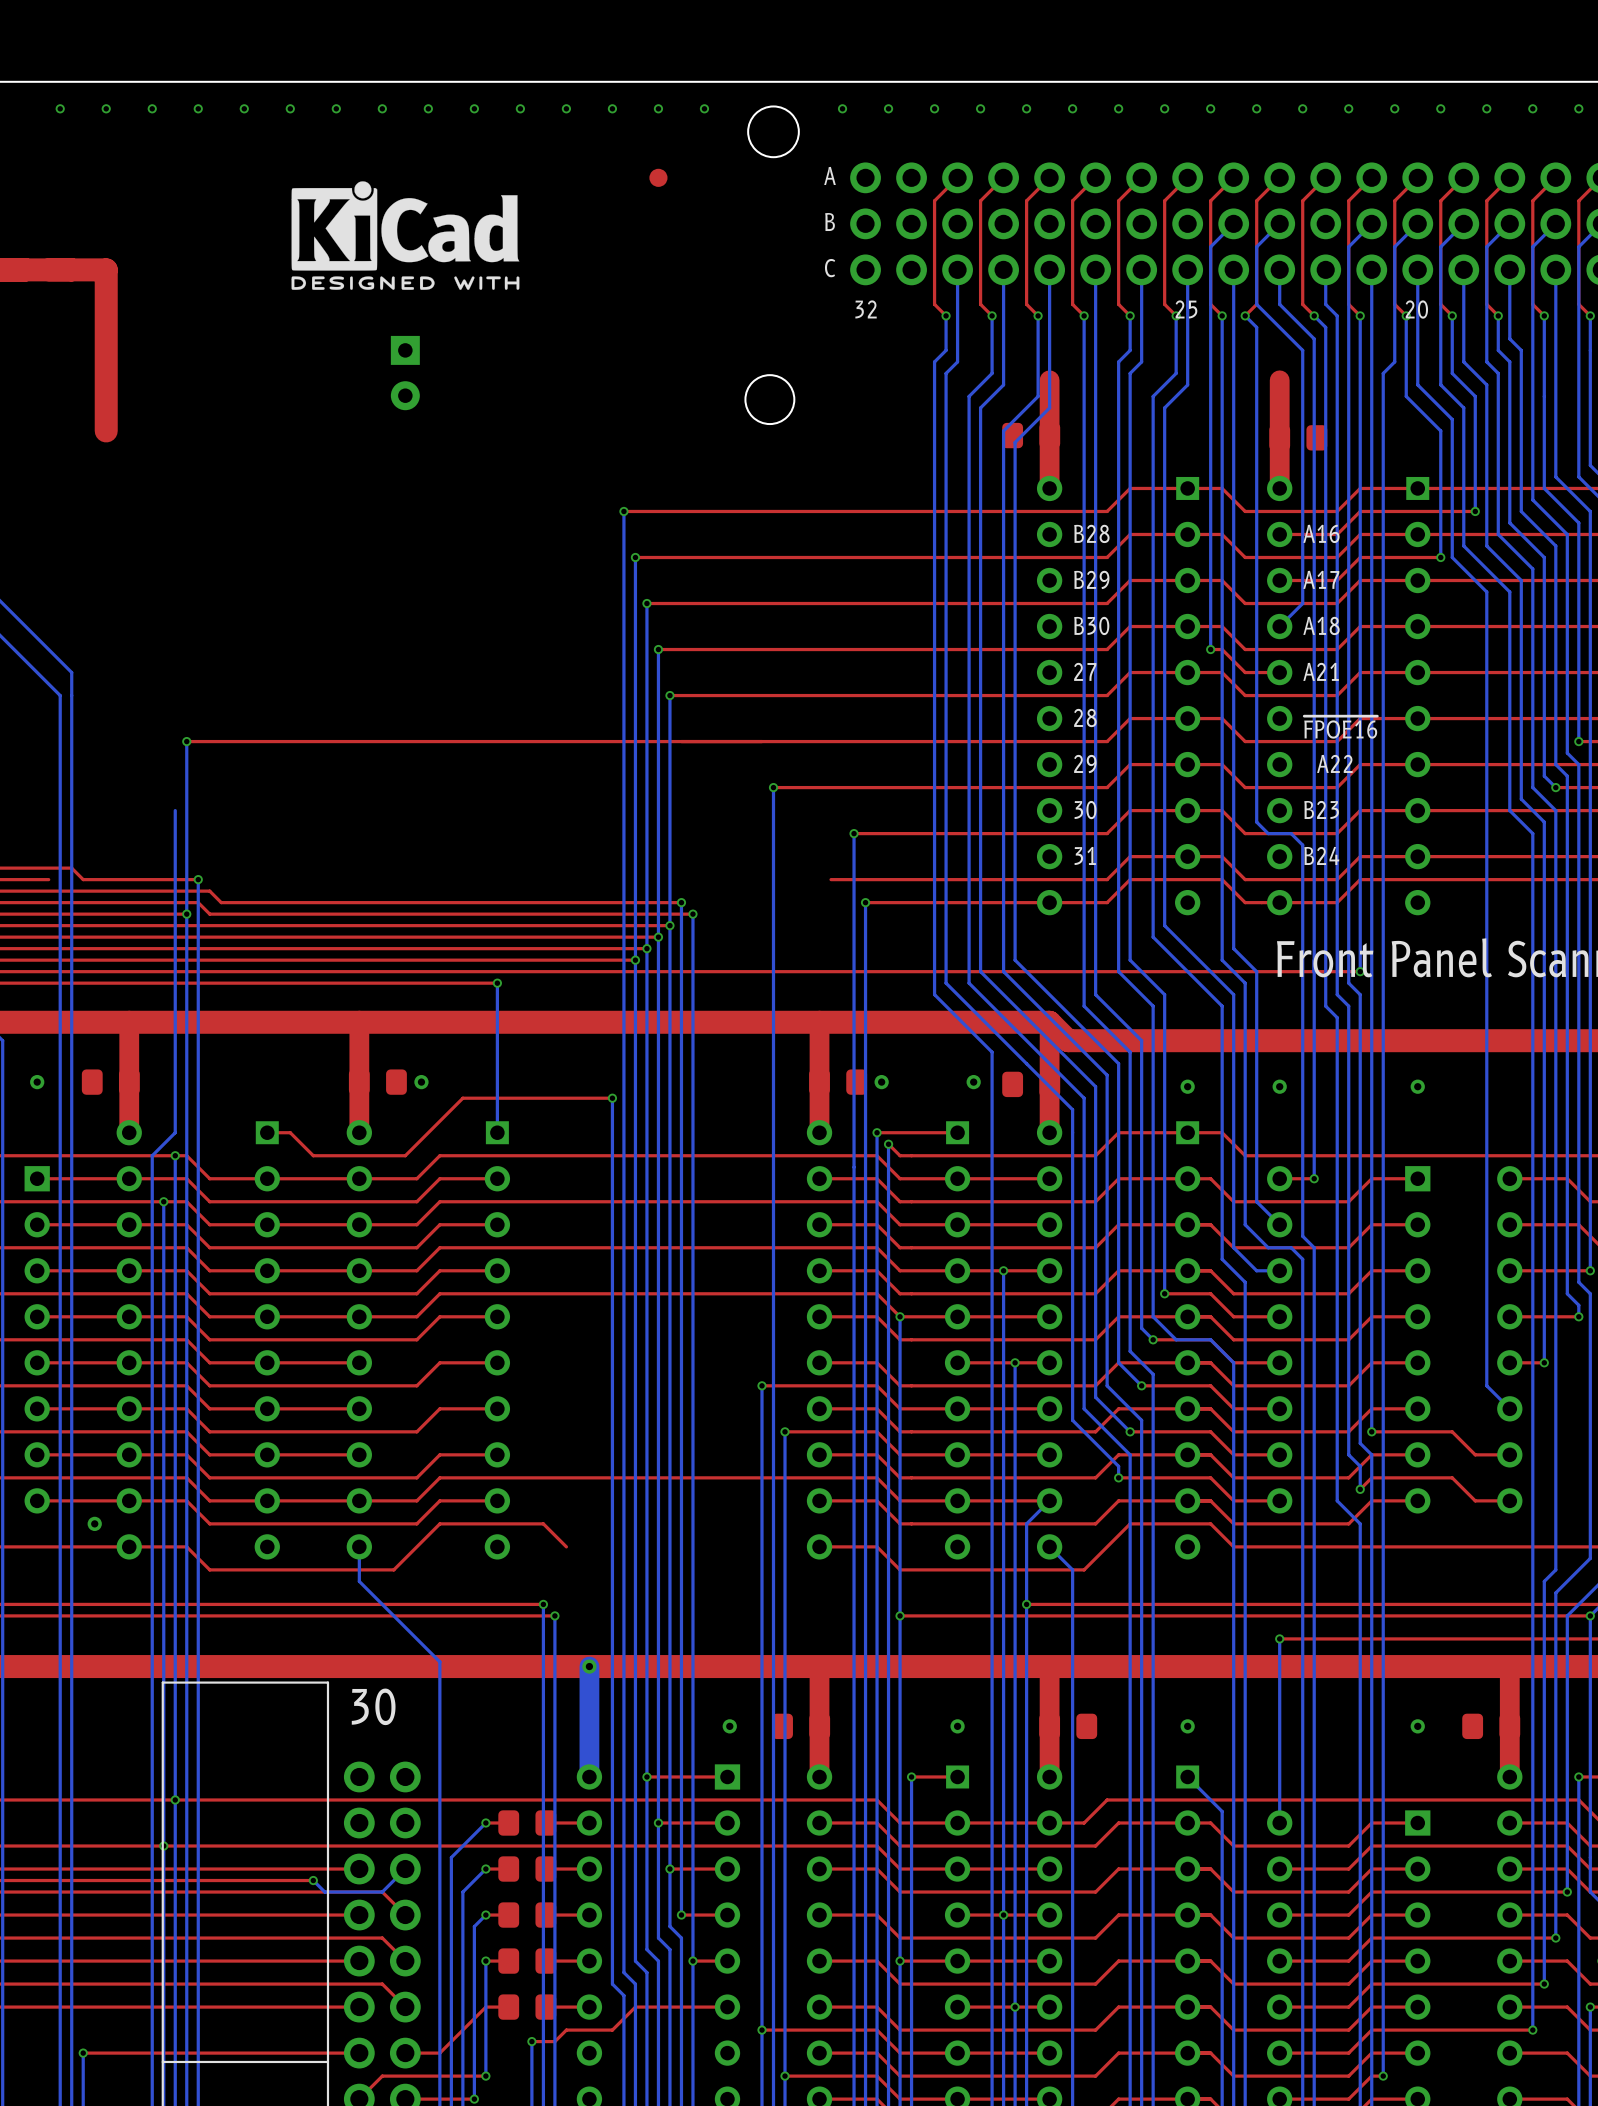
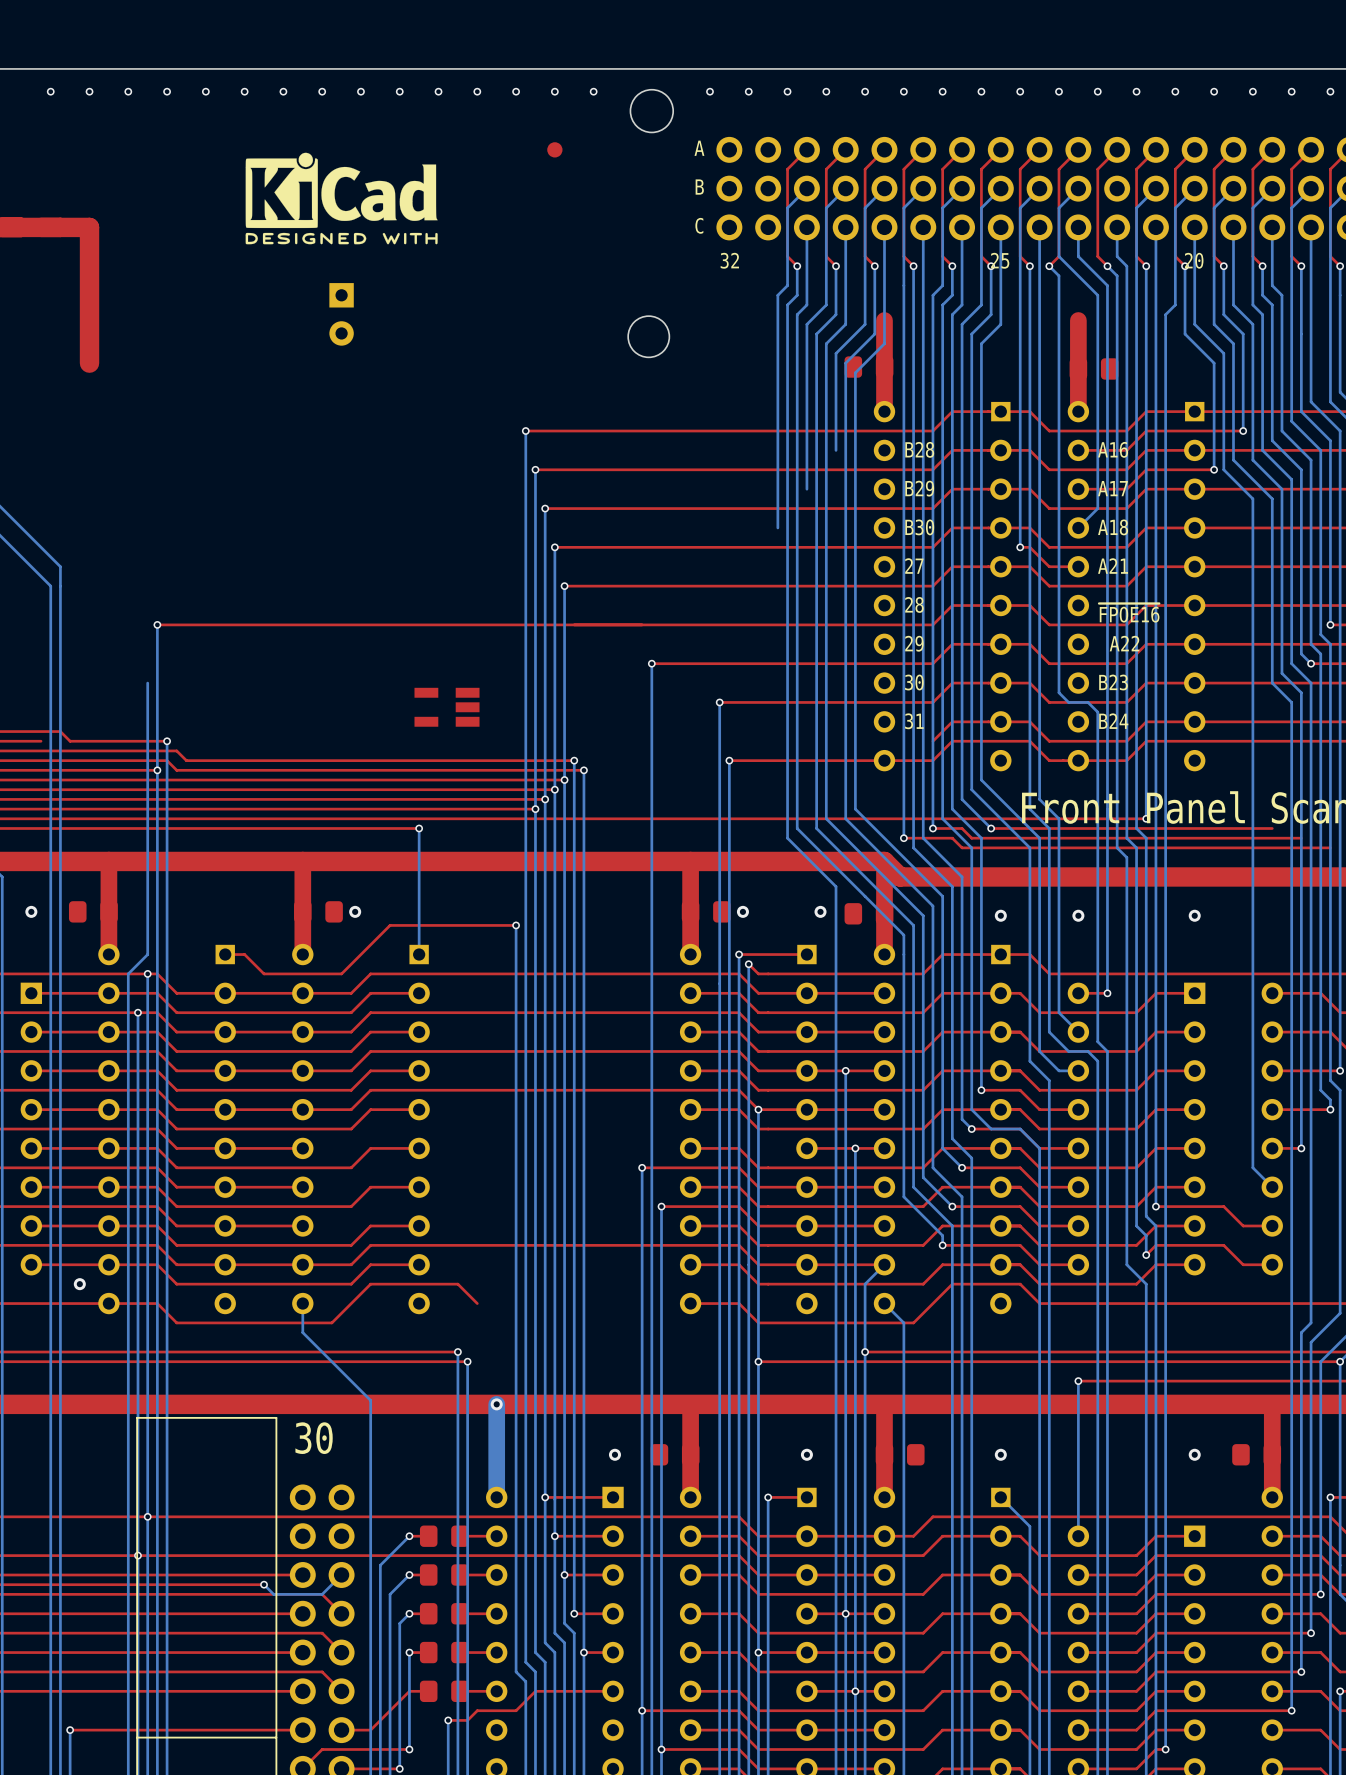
bottom track: none -> (806, 188) (787, 208) (787, 285) (777, 295) (777, 527)
bottom track: none -> (845, 188) (826, 208) (826, 304) (806, 324) (806, 489)
bottom track: none -> (884, 188) (865, 208) (865, 324) (836, 353) (836, 450)
bottom track: none -> (923, 188) (903, 208) (903, 838)
bottom track: none -> (962, 188) (942, 208) (942, 285) (932, 295) (932, 828)
bottom track: none -> (1000, 188) (981, 208) (981, 304) (962, 324) (962, 799) (991, 828)
part: none -> (447, 707)
top track: (1107, 879) (831, 879) -> none
top track: none -> (932, 828) (962, 828) (971, 838) (1301, 838)
via: none -> (932, 828)
via: none -> (991, 828)
top track: none -> (1272, 828) (991, 828)
top track: none -> (903, 838) (952, 838) (962, 847) (1330, 847)
via: none -> (903, 838)

